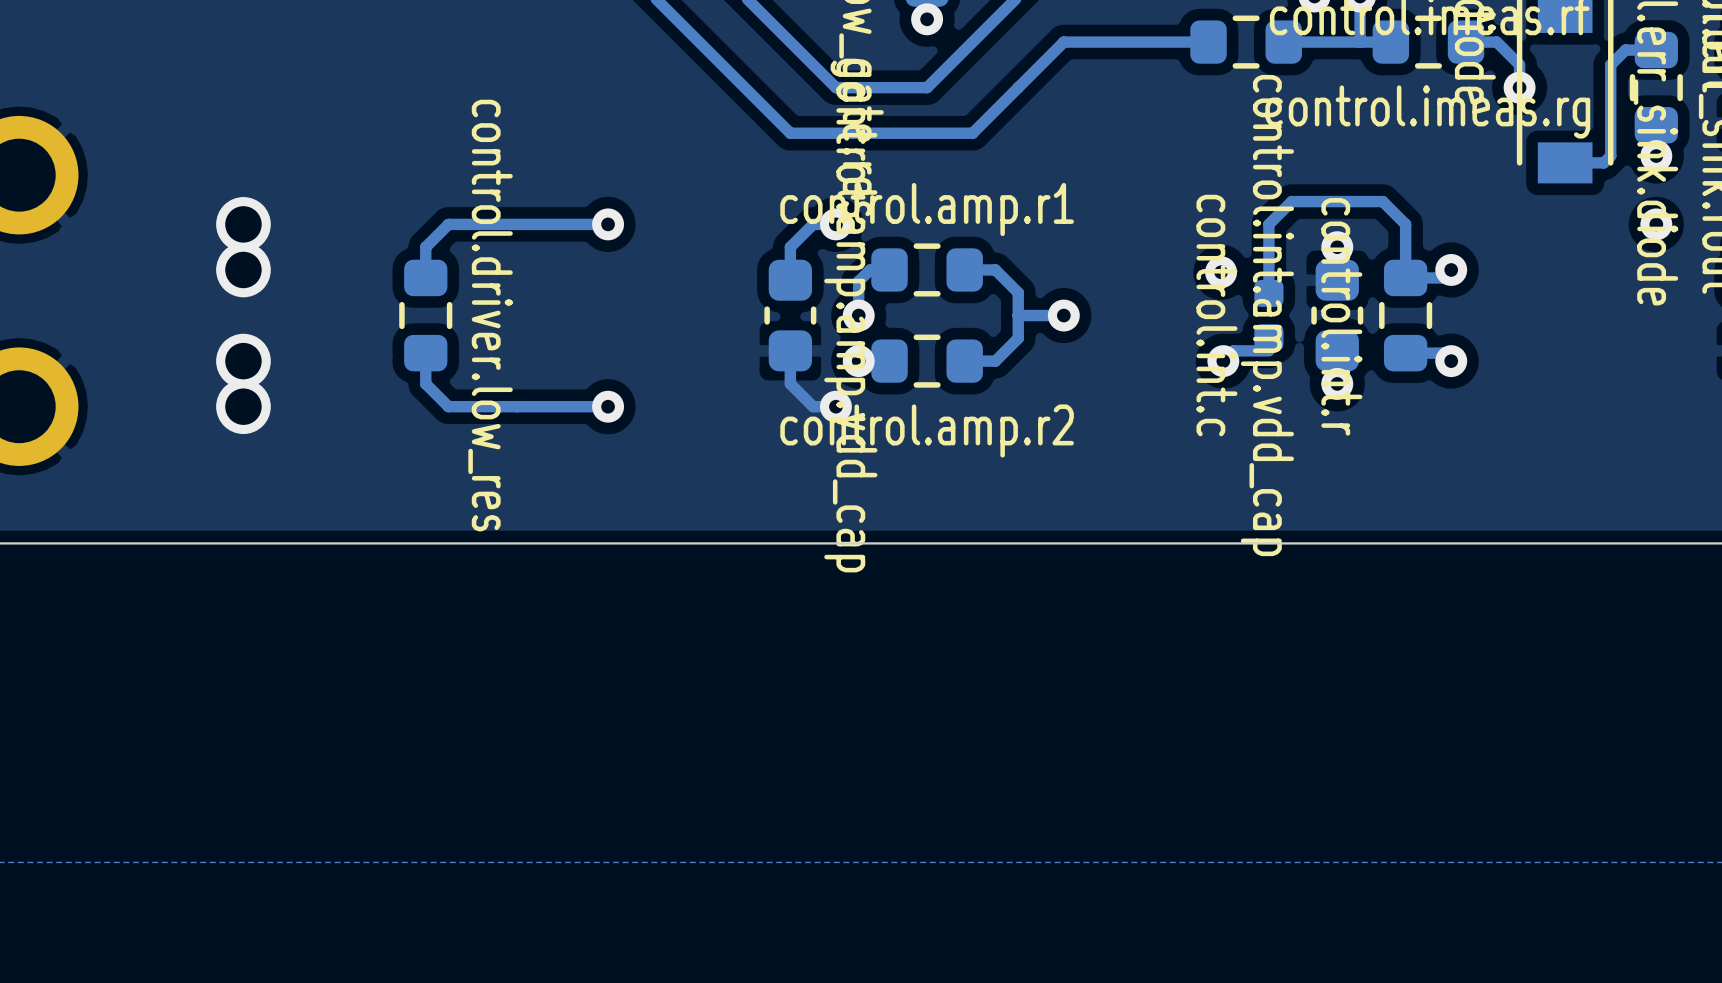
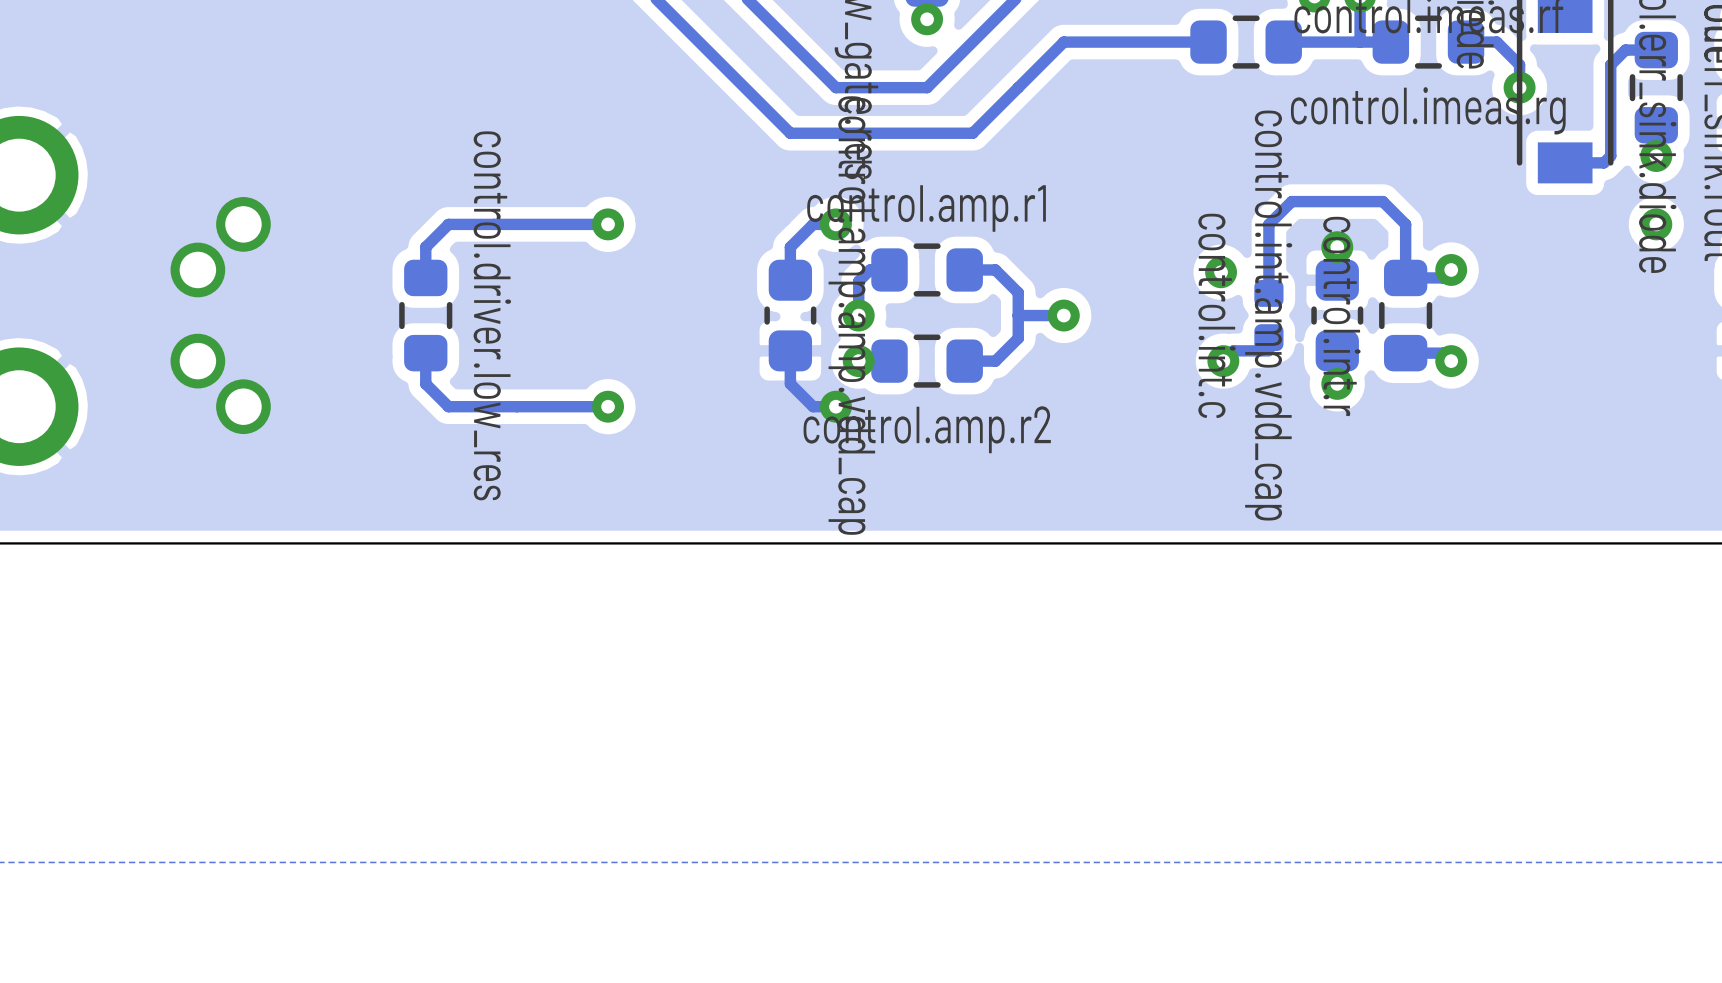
via position: (243, 269) -> (197, 269)
via position: (243, 361) -> (197, 361)

